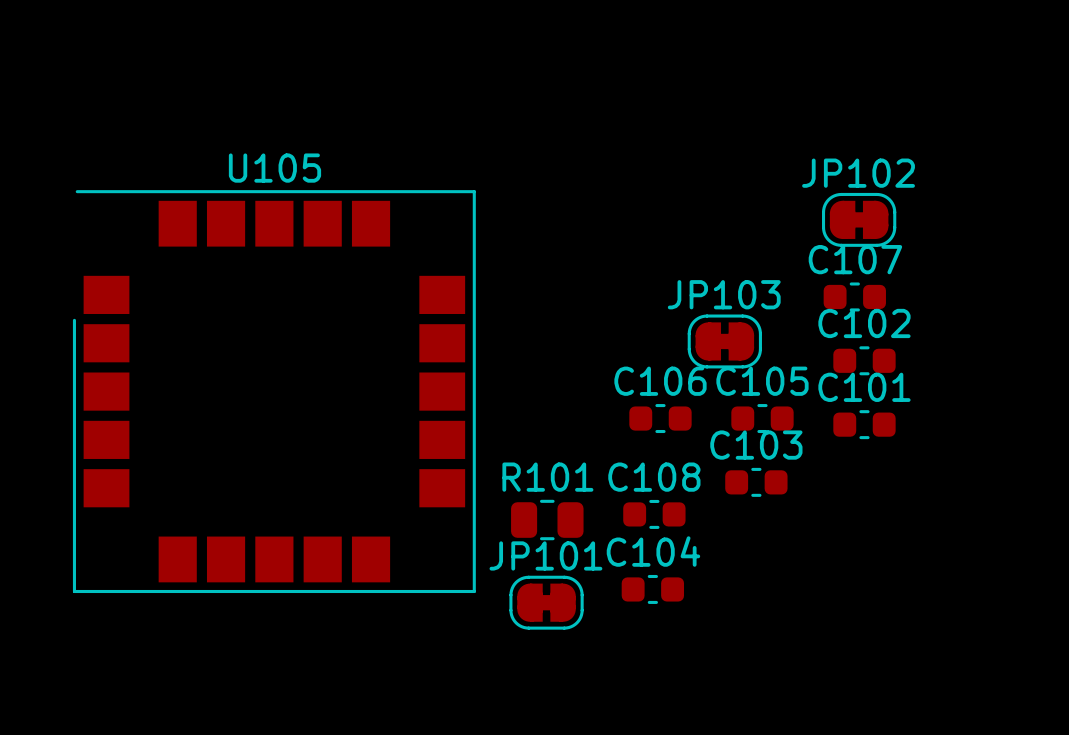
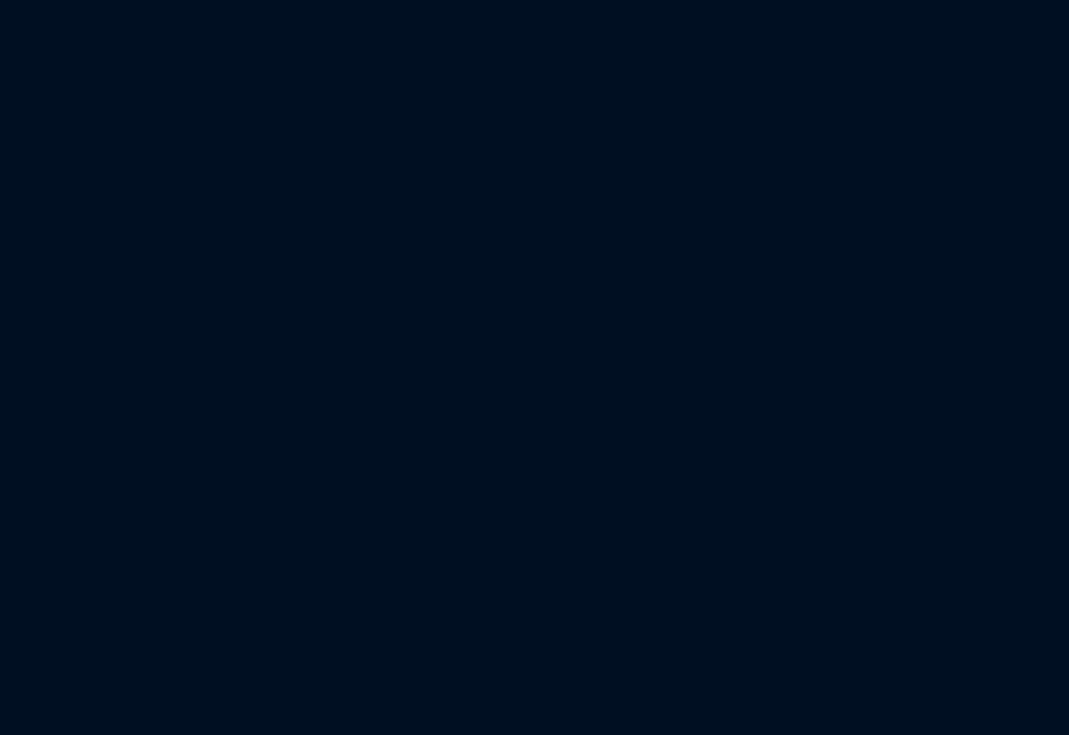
JP102: (859, 219) -> none
C107: (854, 296) -> none
JP103: (724, 341) -> none
C102: (864, 360) -> none
U105: (274, 391) -> none
C106: (660, 418) -> none
C105: (762, 418) -> none
C101: (864, 424) -> none
C103: (756, 482) -> none
C108: (654, 514) -> none
R101: (547, 520) -> none
C104: (652, 589) -> none
JP101: (546, 602) -> none

